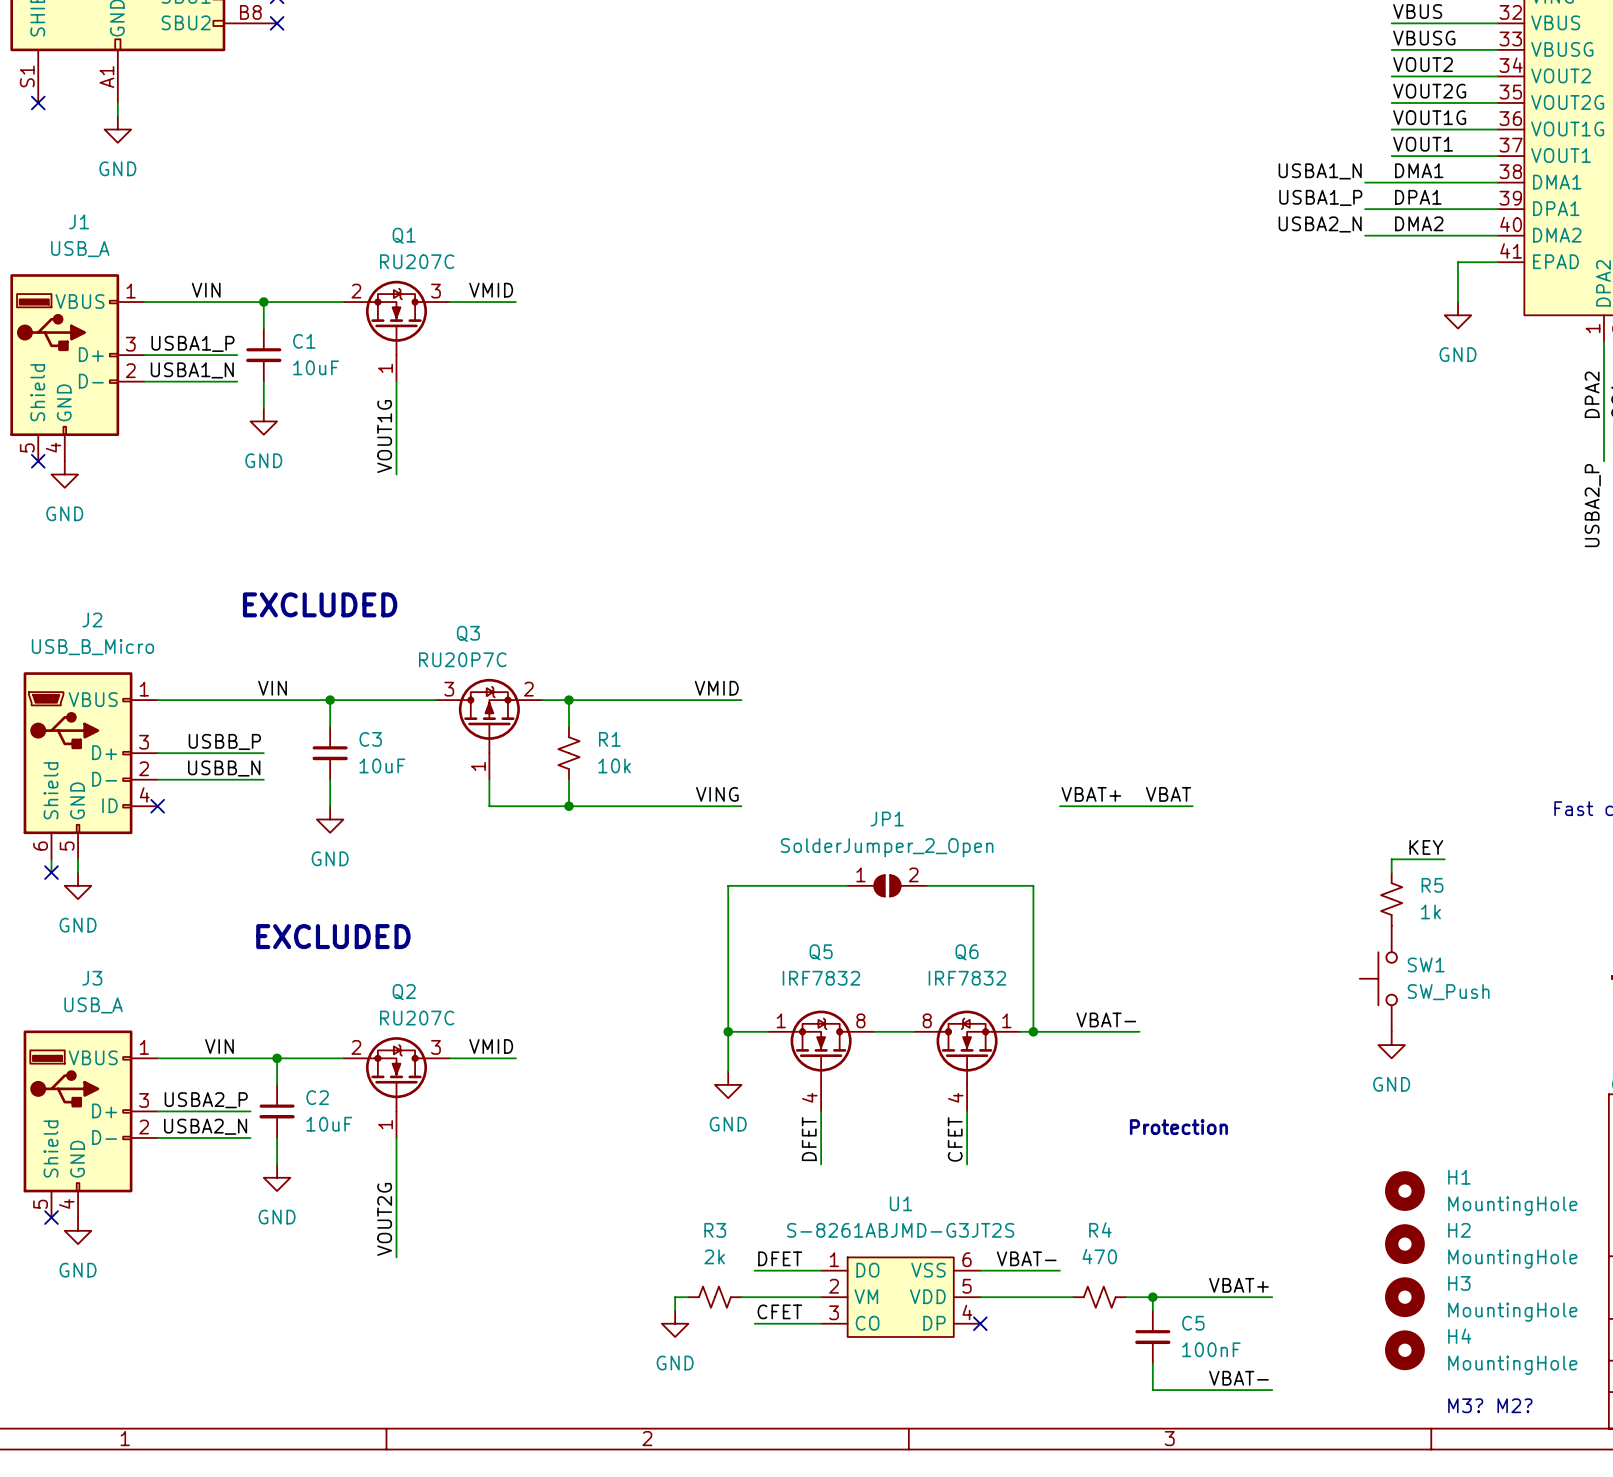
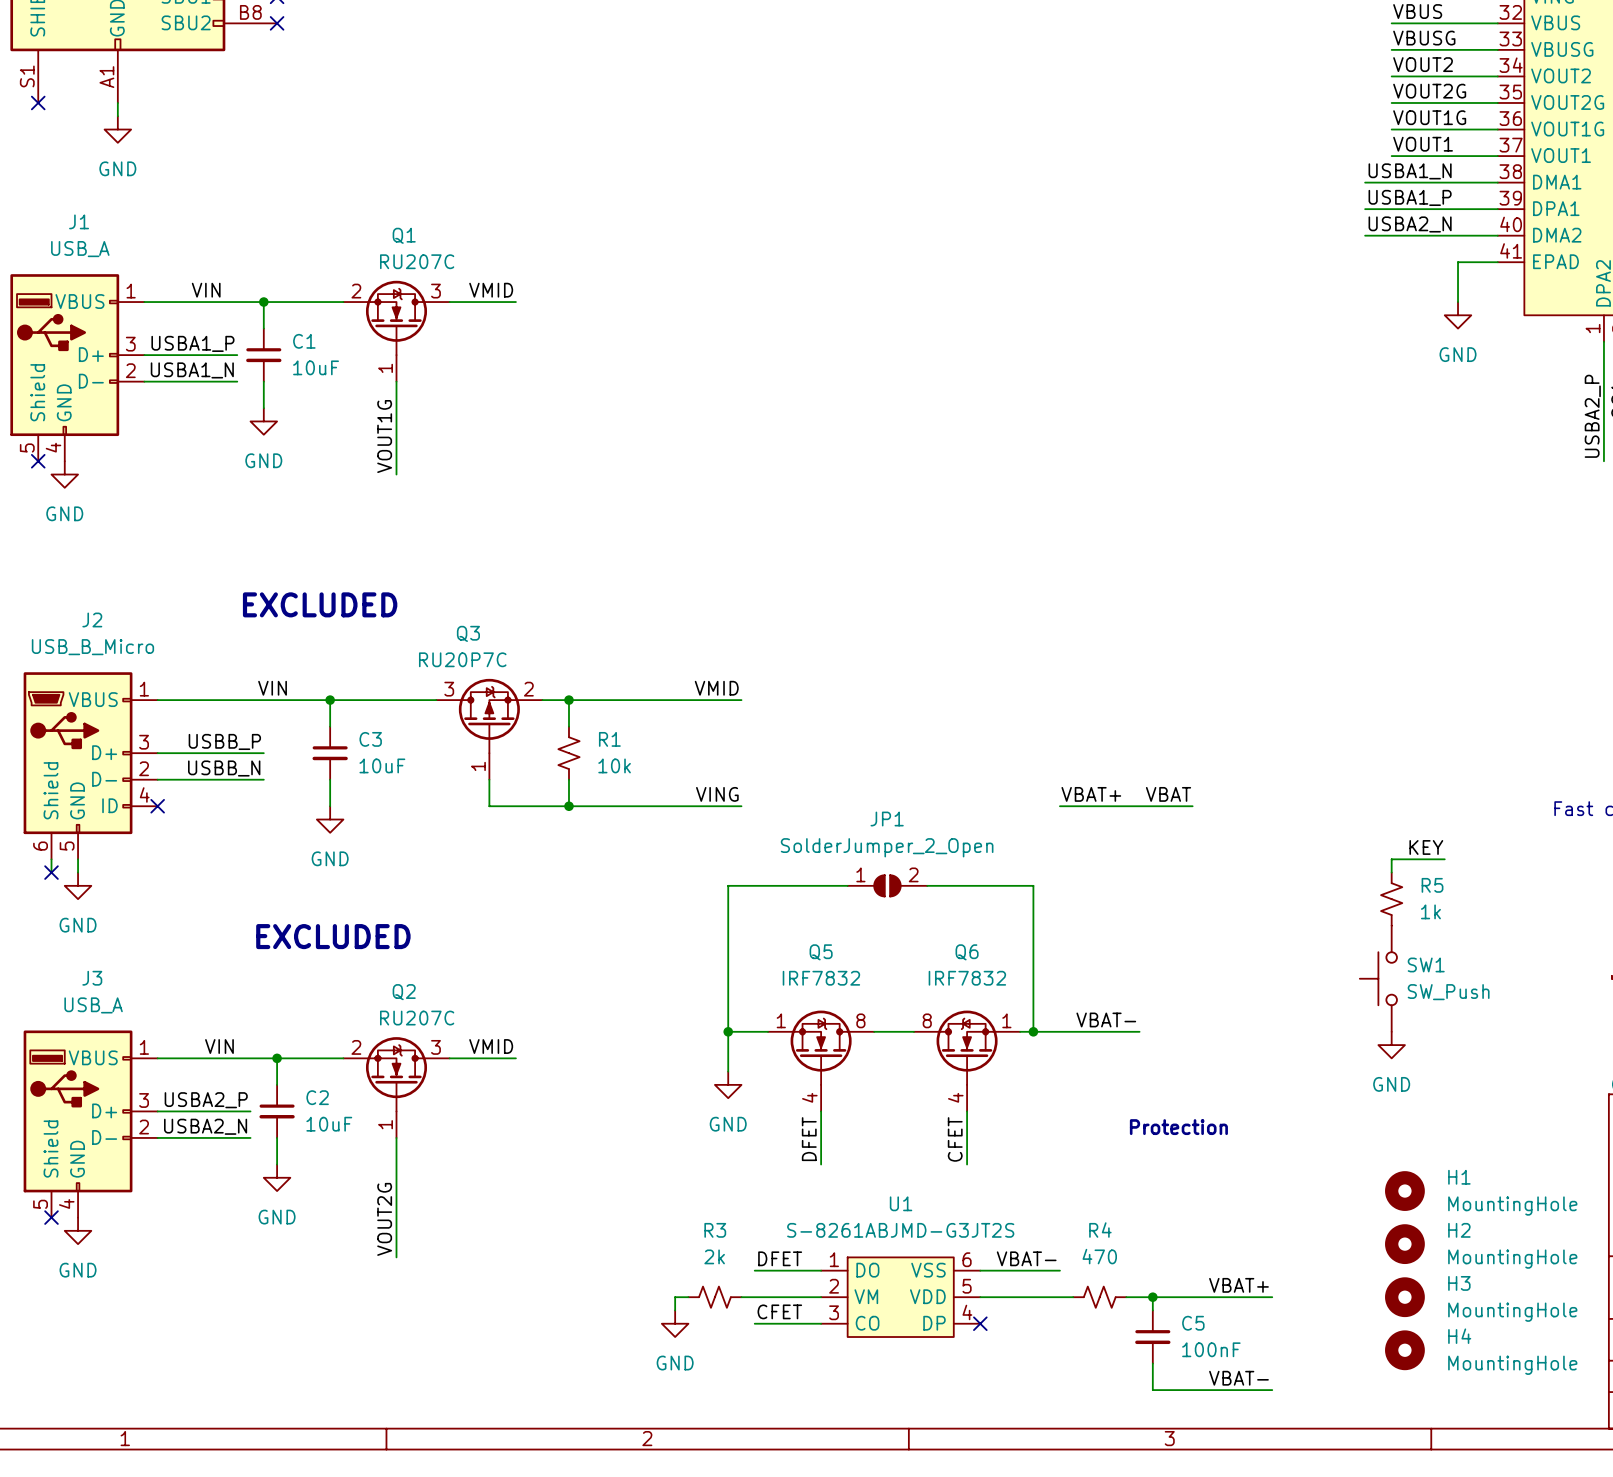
label: DMA1 (1419, 170) -> none
label position: USBA1_N (1320, 171) -> USBA1_N (1410, 171)
label position: USBA1_P (1320, 197) -> USBA1_P (1410, 197)
label: DPA1 (1418, 197) -> none
label: DMA2 (1419, 223) -> none
label position: USBA2_N (1320, 224) -> USBA2_N (1410, 224)
label: DPA2 (1592, 394) -> none
label position: USBA2_P (1592, 505) -> USBA2_P (1592, 416)
text: M3? M2? (1490, 1405) -> none

